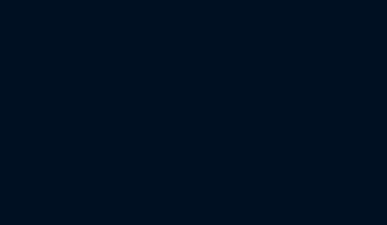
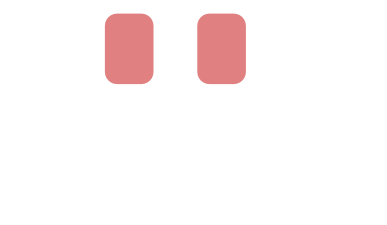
part: none -> (175, 48)

